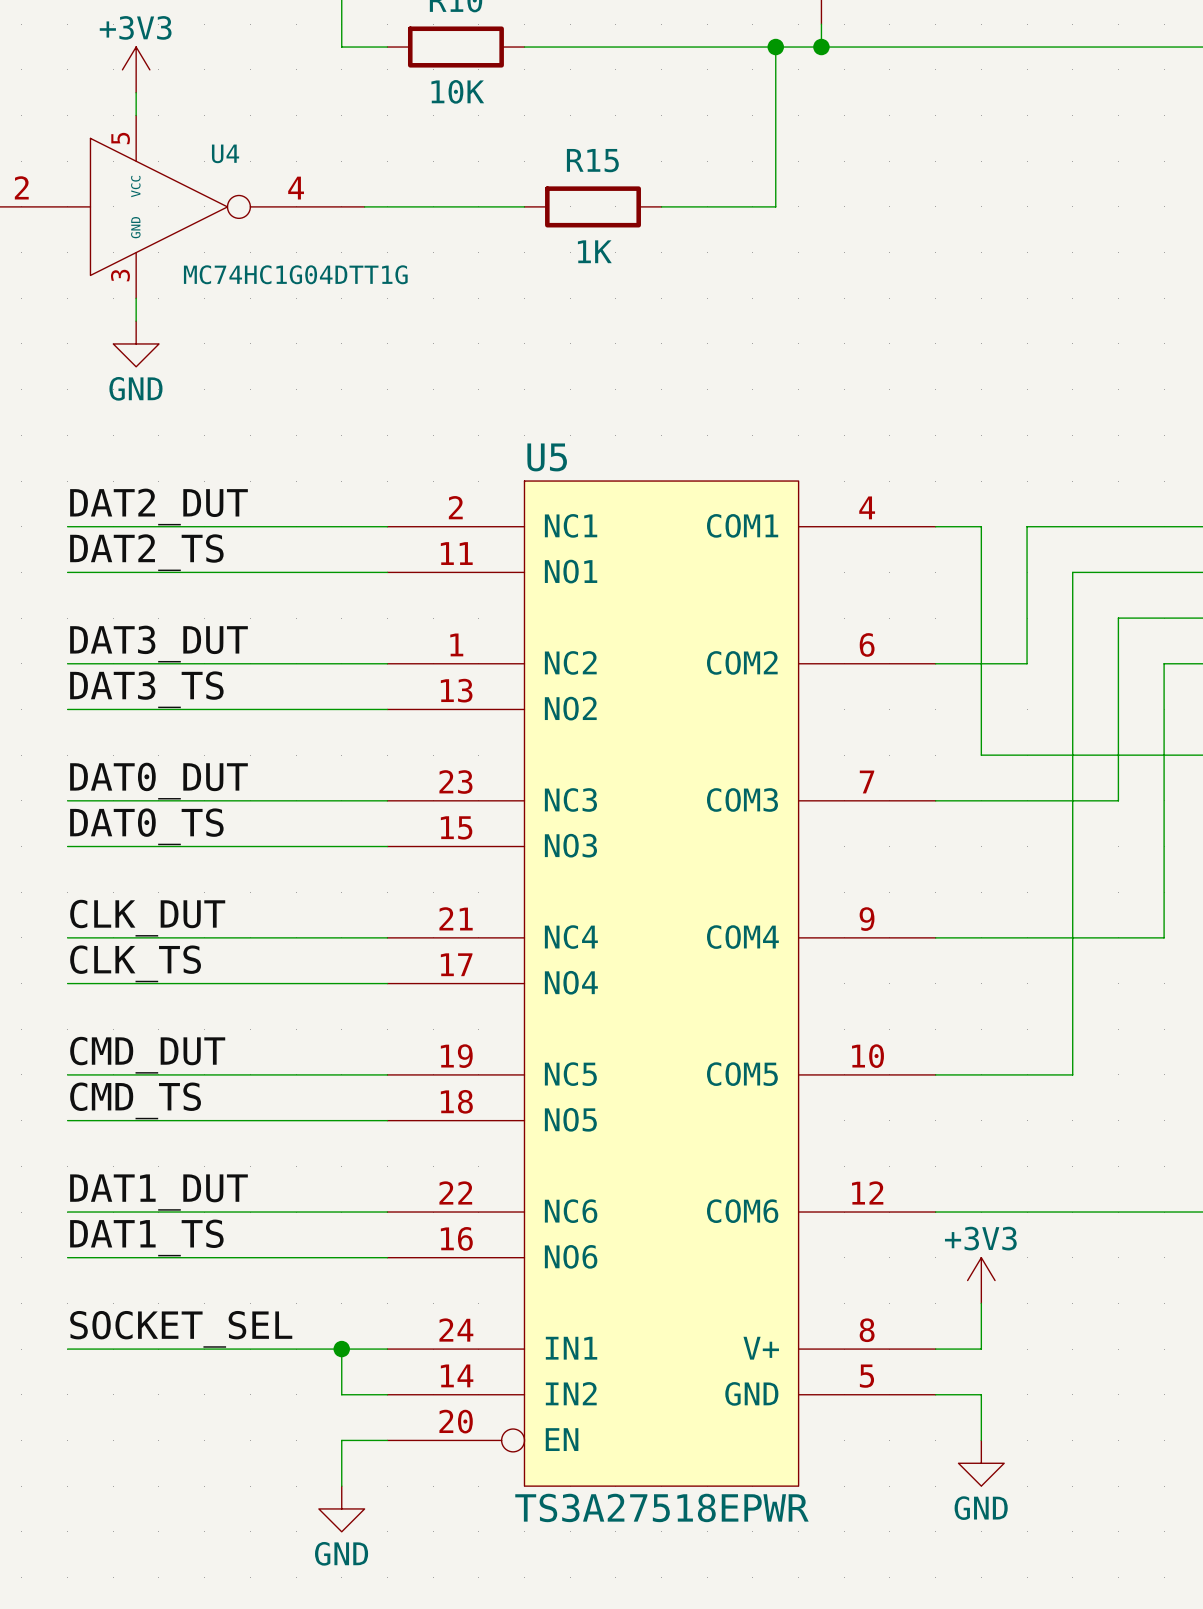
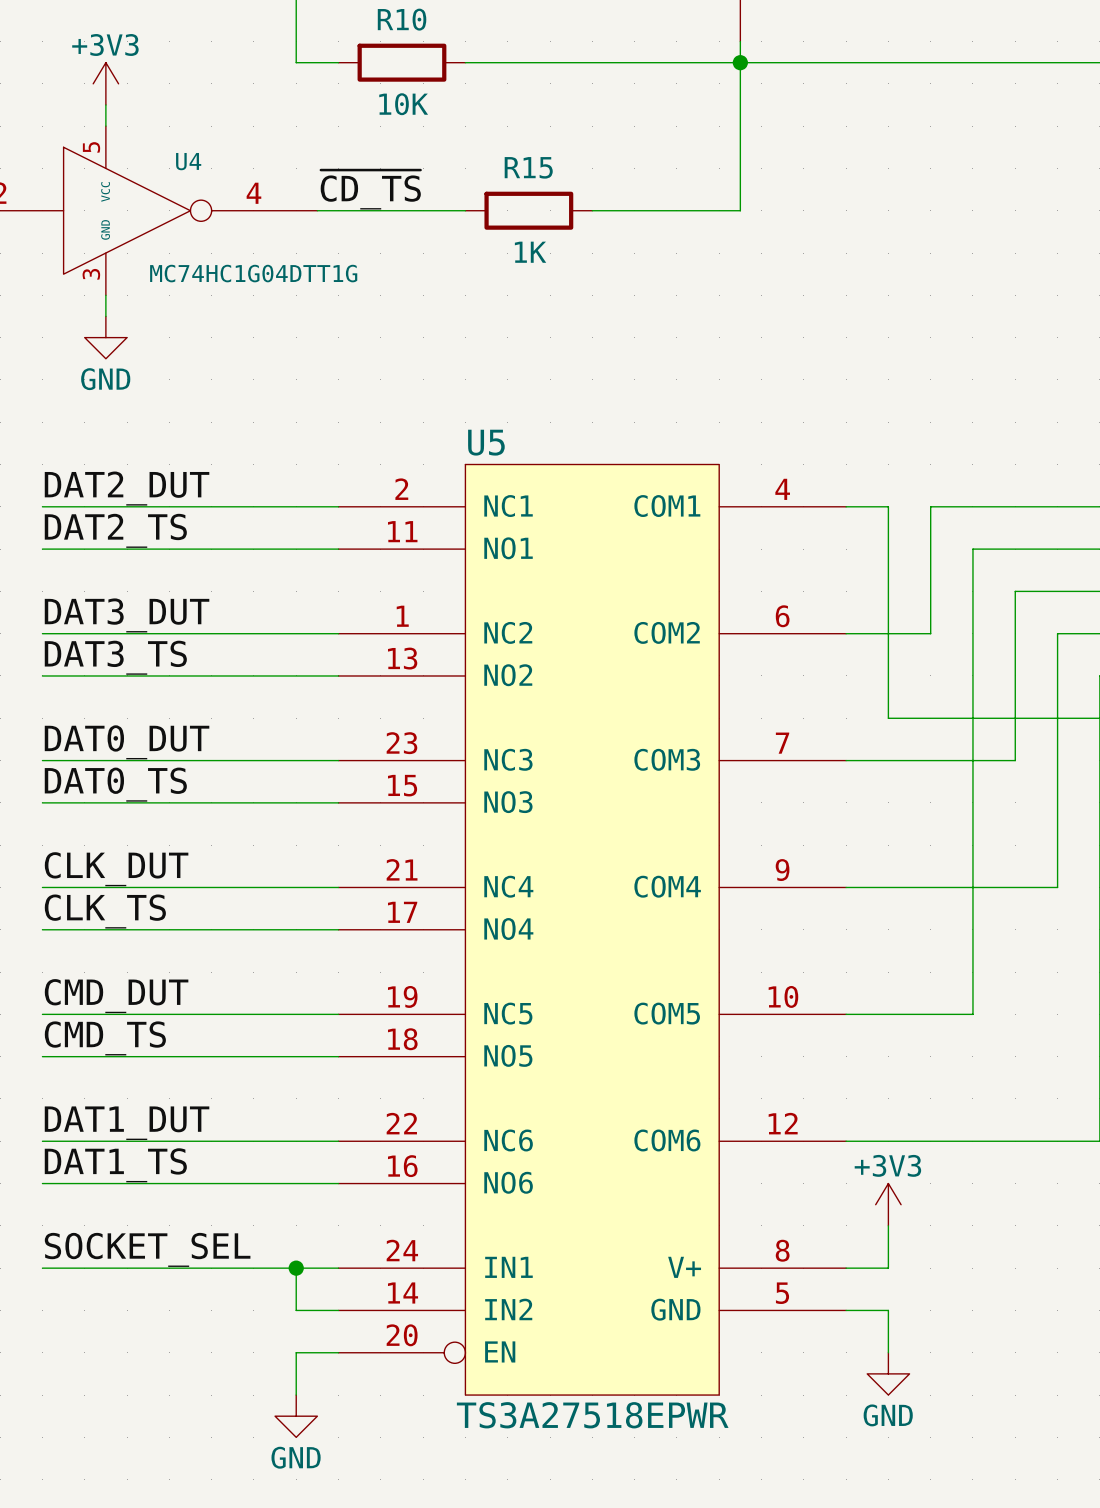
wire: (775, 47) (775, 206) -> (740, 62) (740, 210) (698, 210)
junction: (775, 47) -> none
label: none -> ~{CD_TS} (370, 189)

